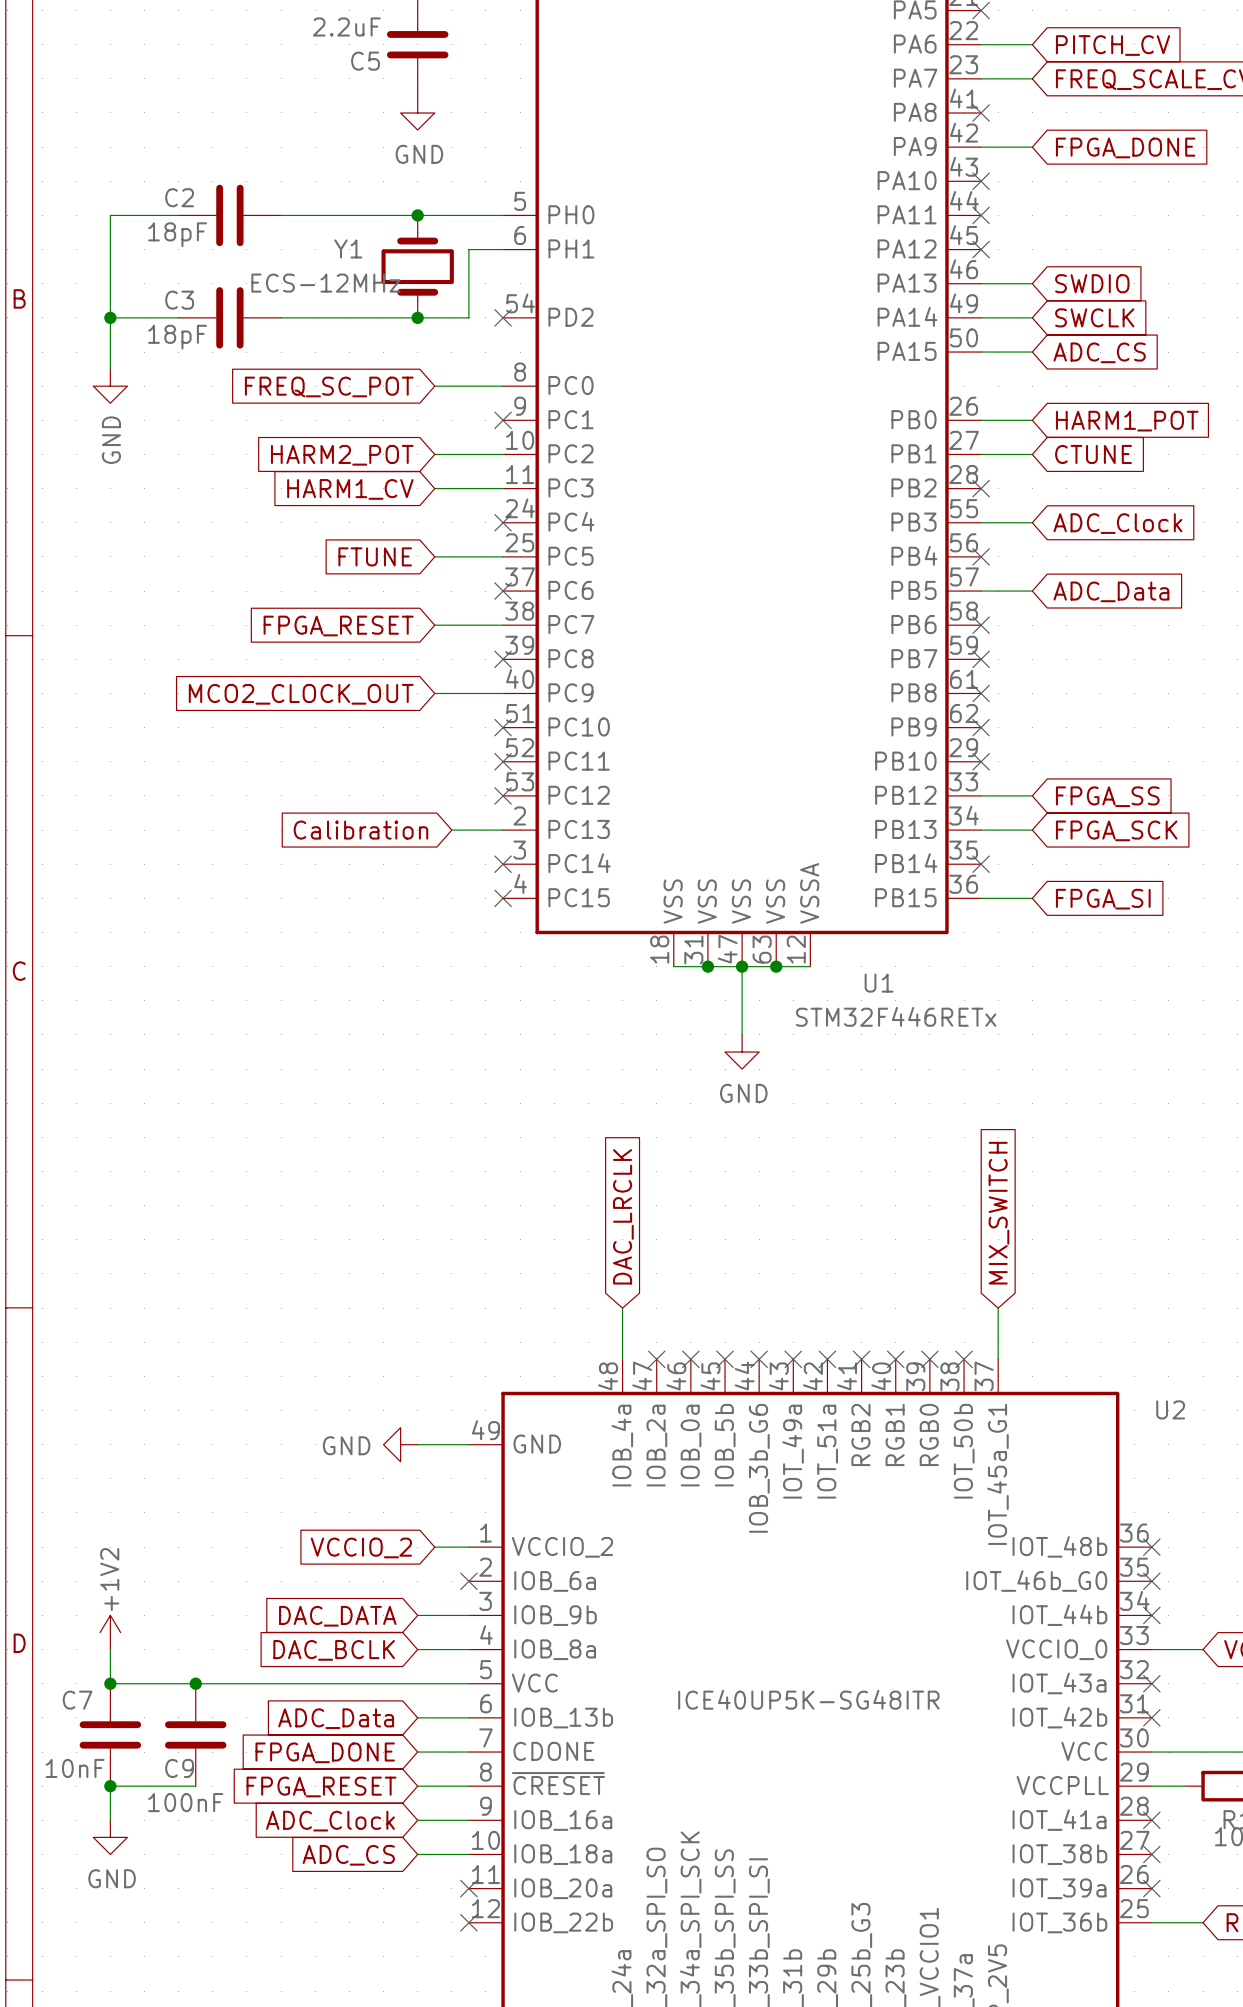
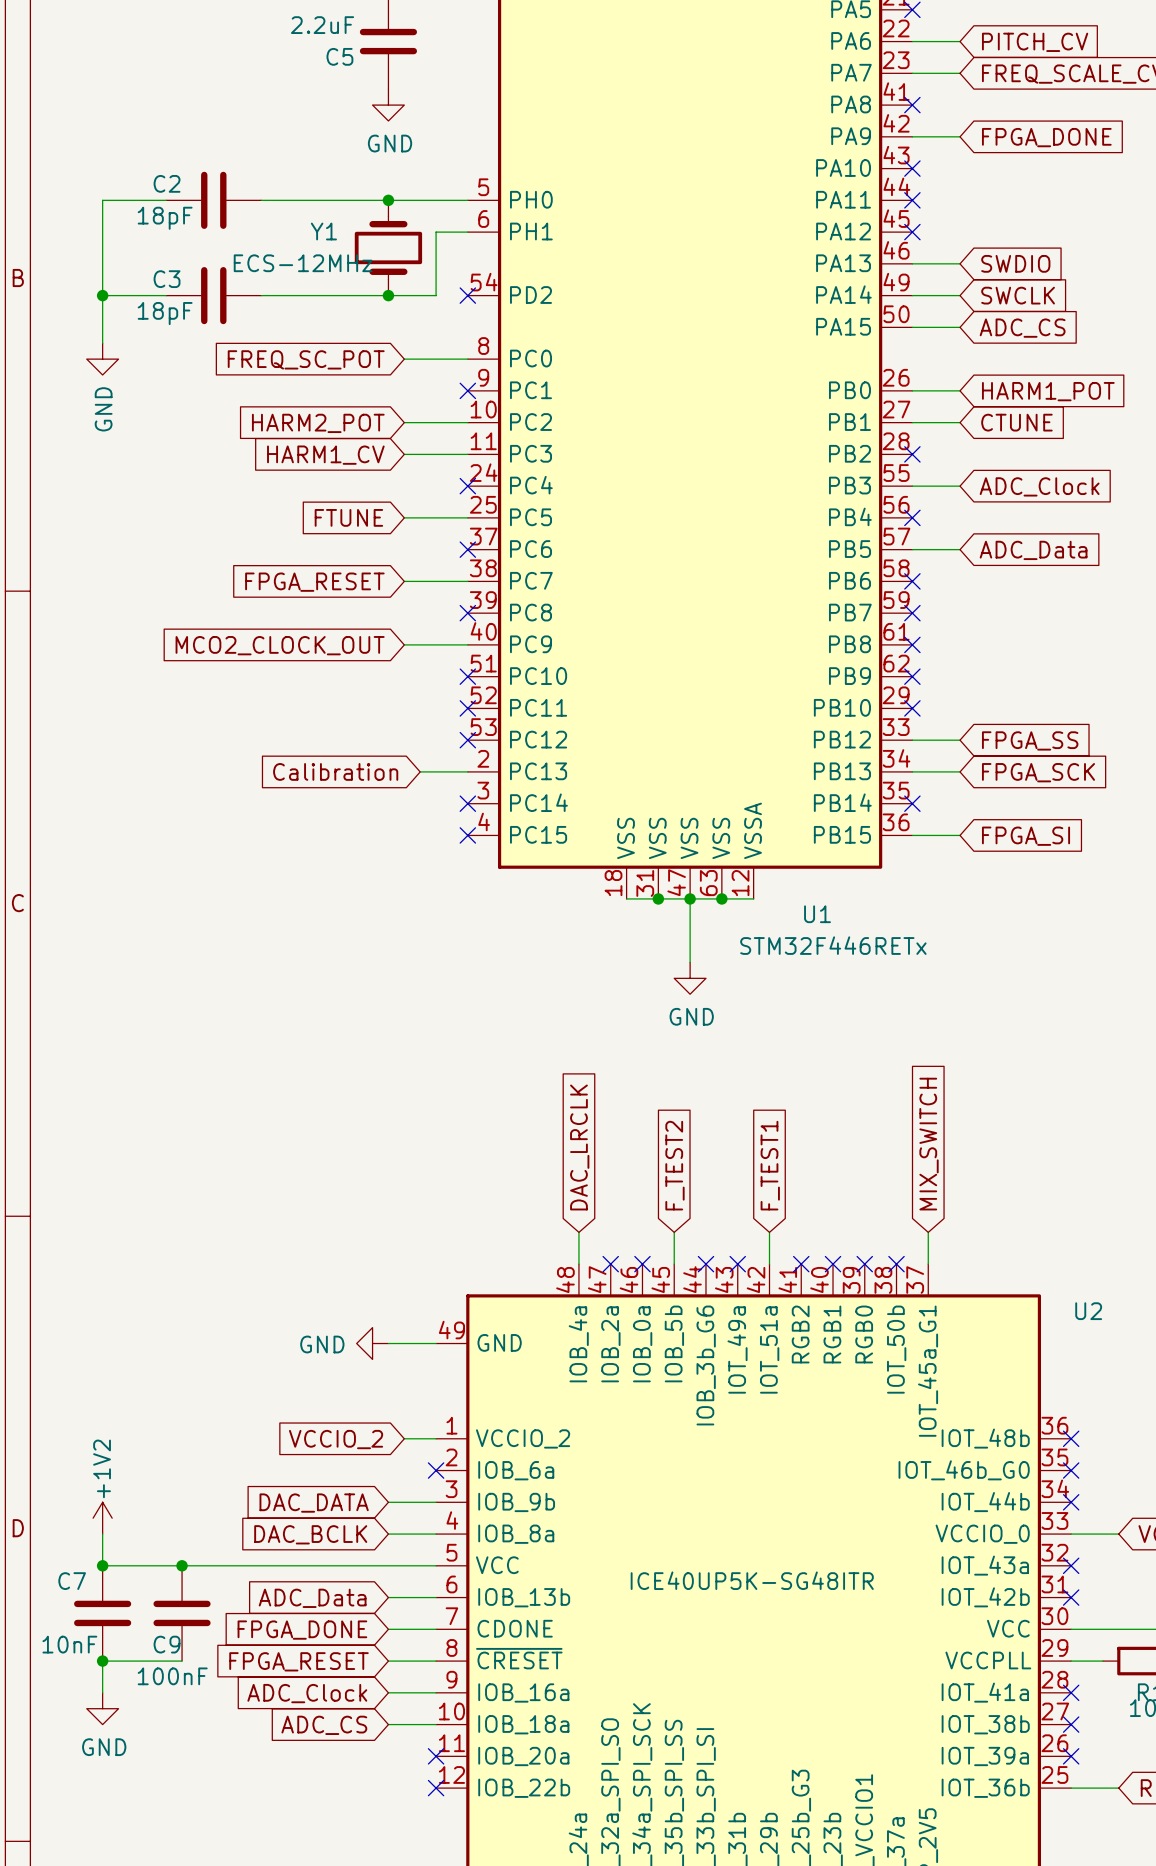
global label position: MIX_SWITCH (998, 1213) -> MIX_SWITCH (929, 1144)
global label position: DAC_LRCLK (623, 1216) -> DAC_LRCLK (579, 1147)
global label: none -> F_TEST2 (674, 1165)
global label: none -> F_TEST1 (770, 1165)
wire: (622, 1308) (622, 1325) -> none
wire: (998, 1308) (998, 1325) -> none
wire: none -> (674, 1232) (674, 1264)
wire: none -> (769, 1232) (769, 1264)
no-connect mark: (725, 1359) -> none
no-connect mark: (827, 1359) -> none

